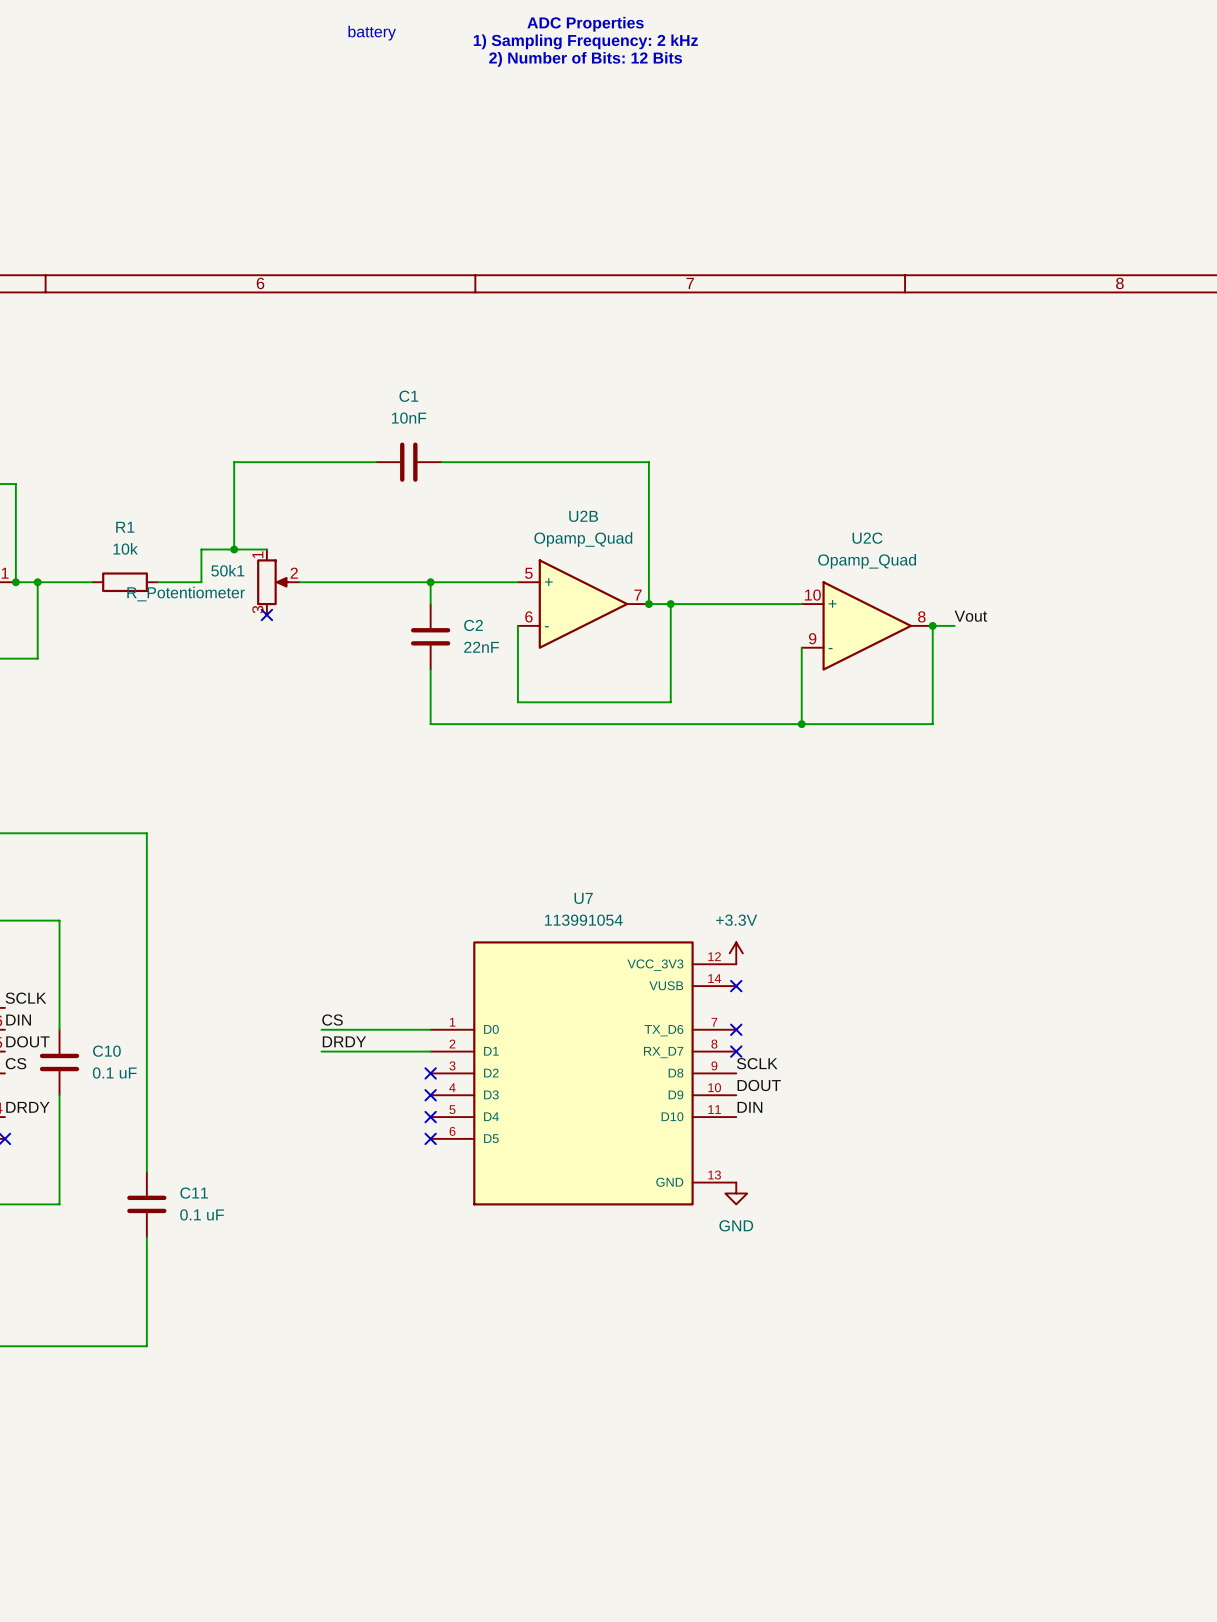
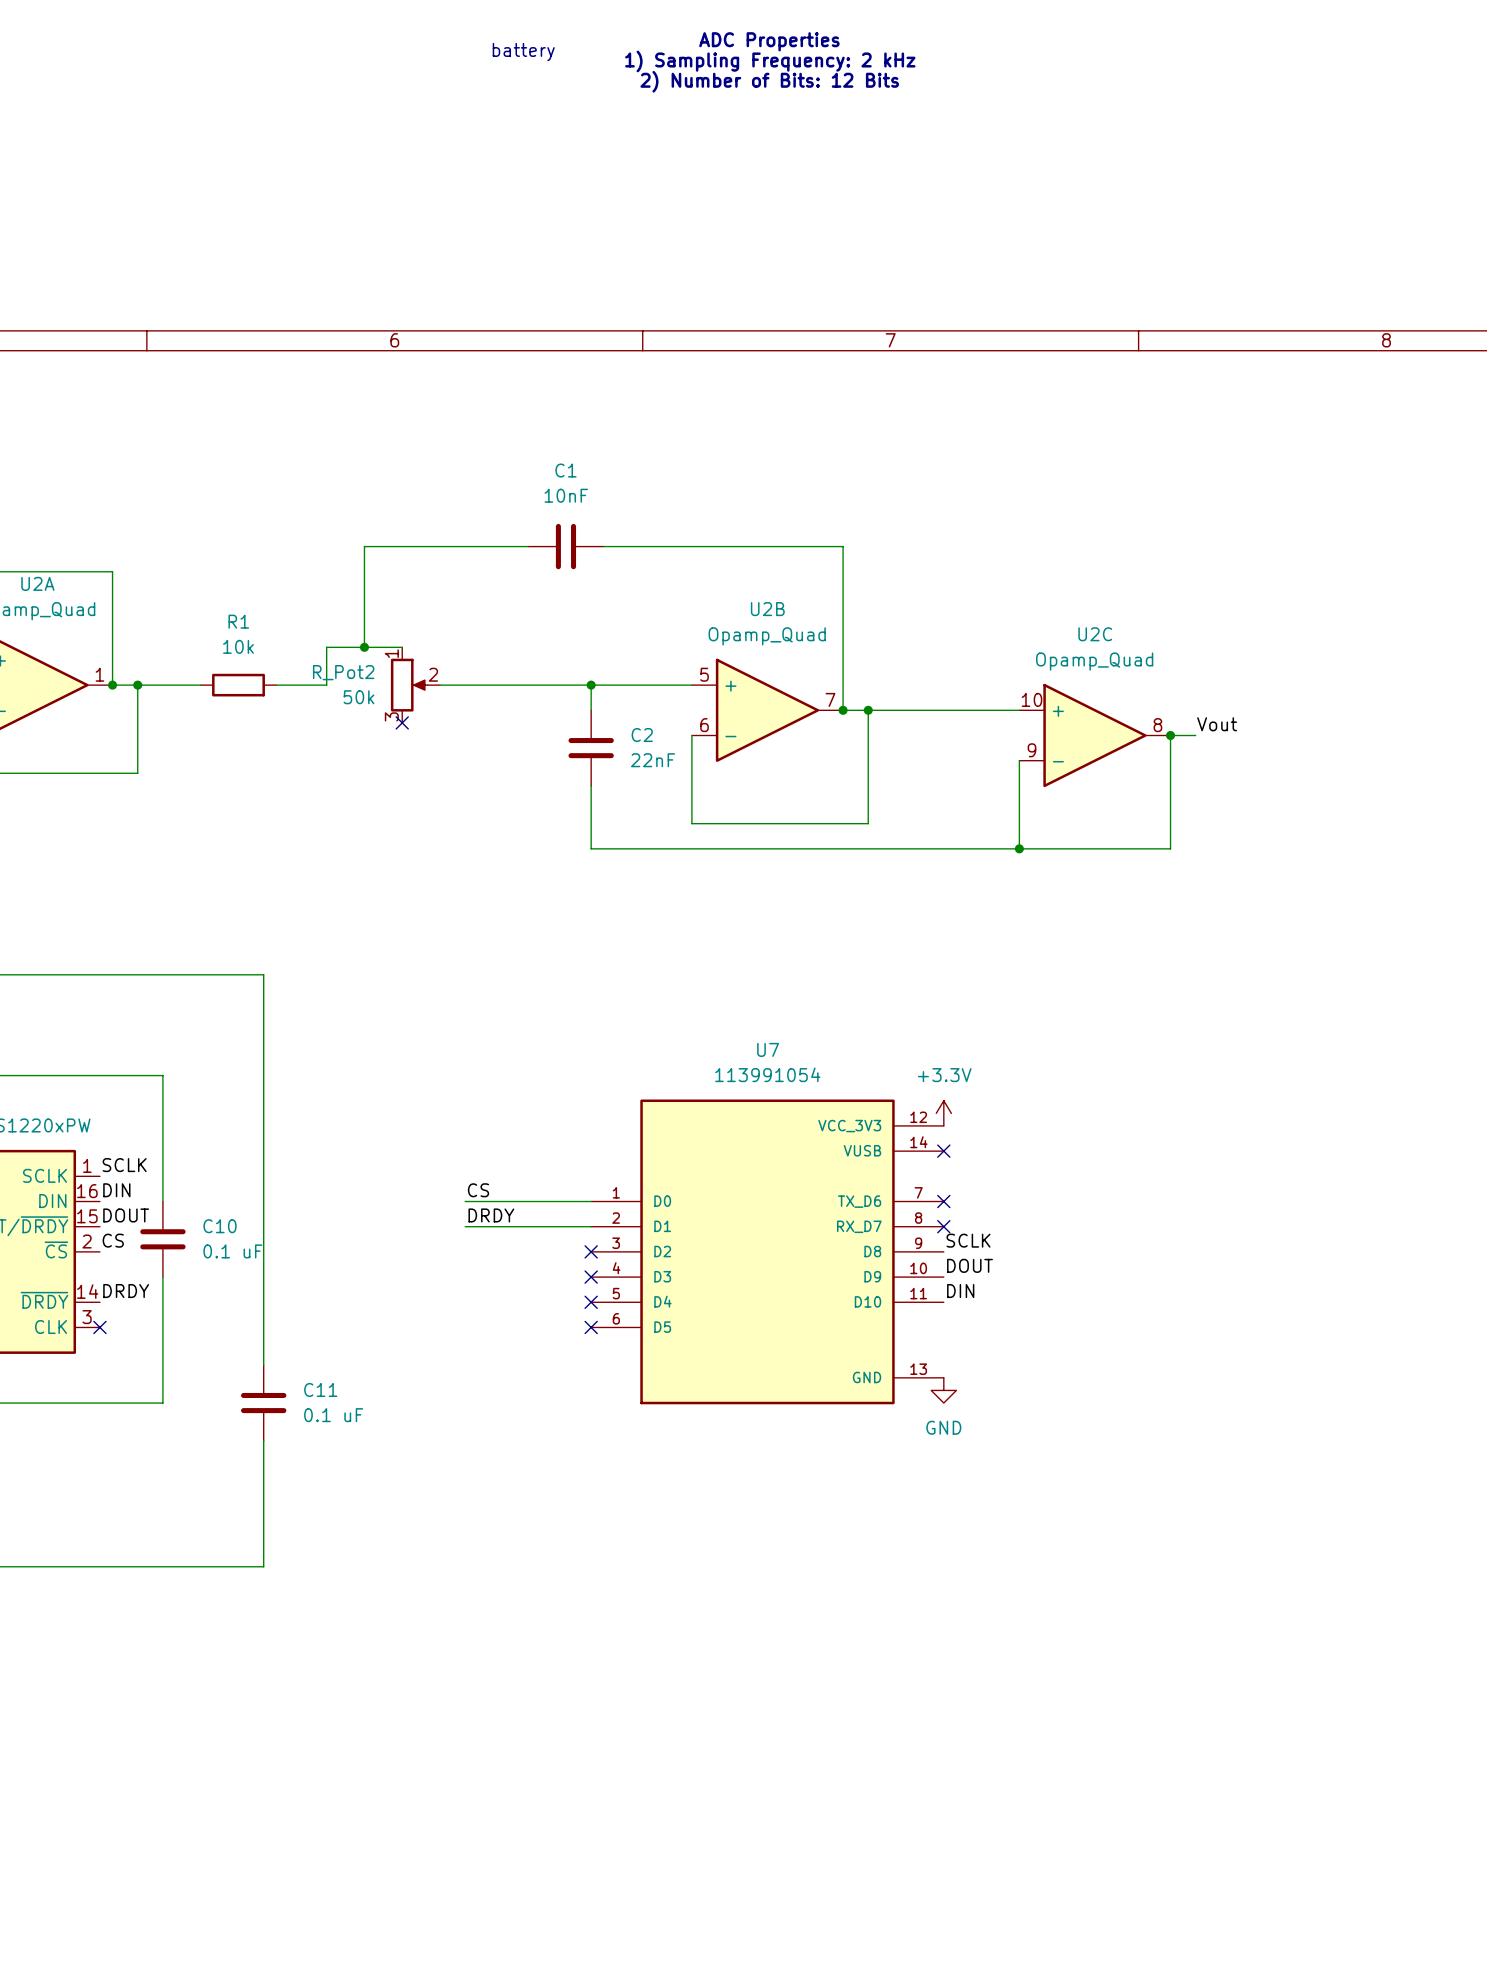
50k1 name: 50k1 (227, 570) -> R_Pot2 (343, 672)
50k1 value: R_Potentiometer (186, 594) -> 50k (358, 697)

